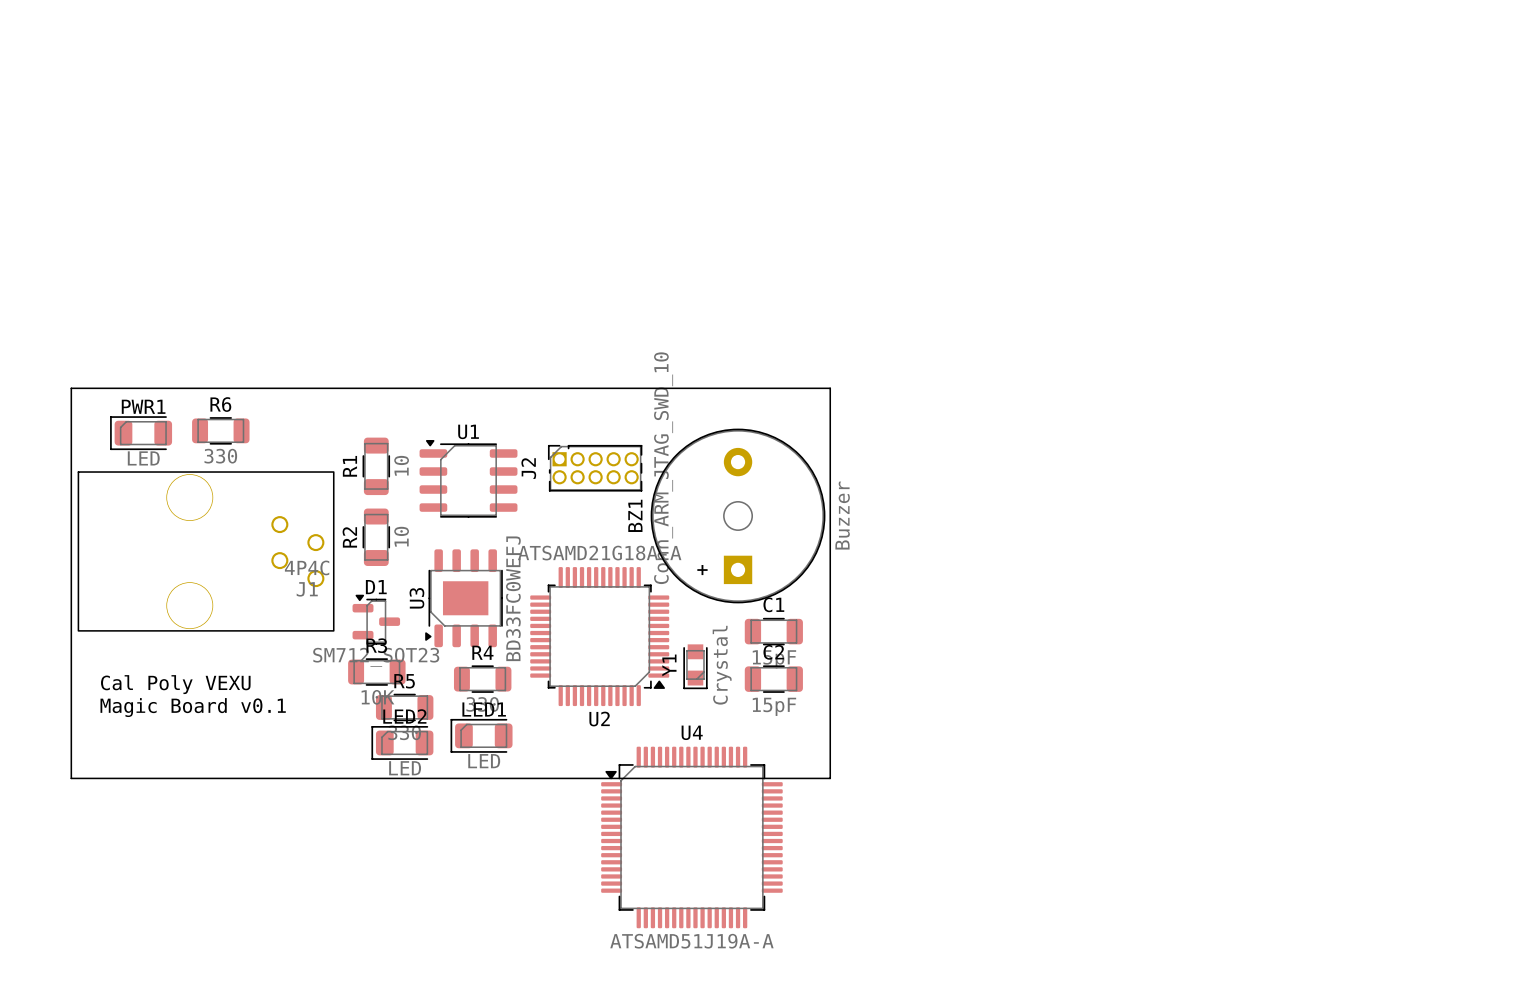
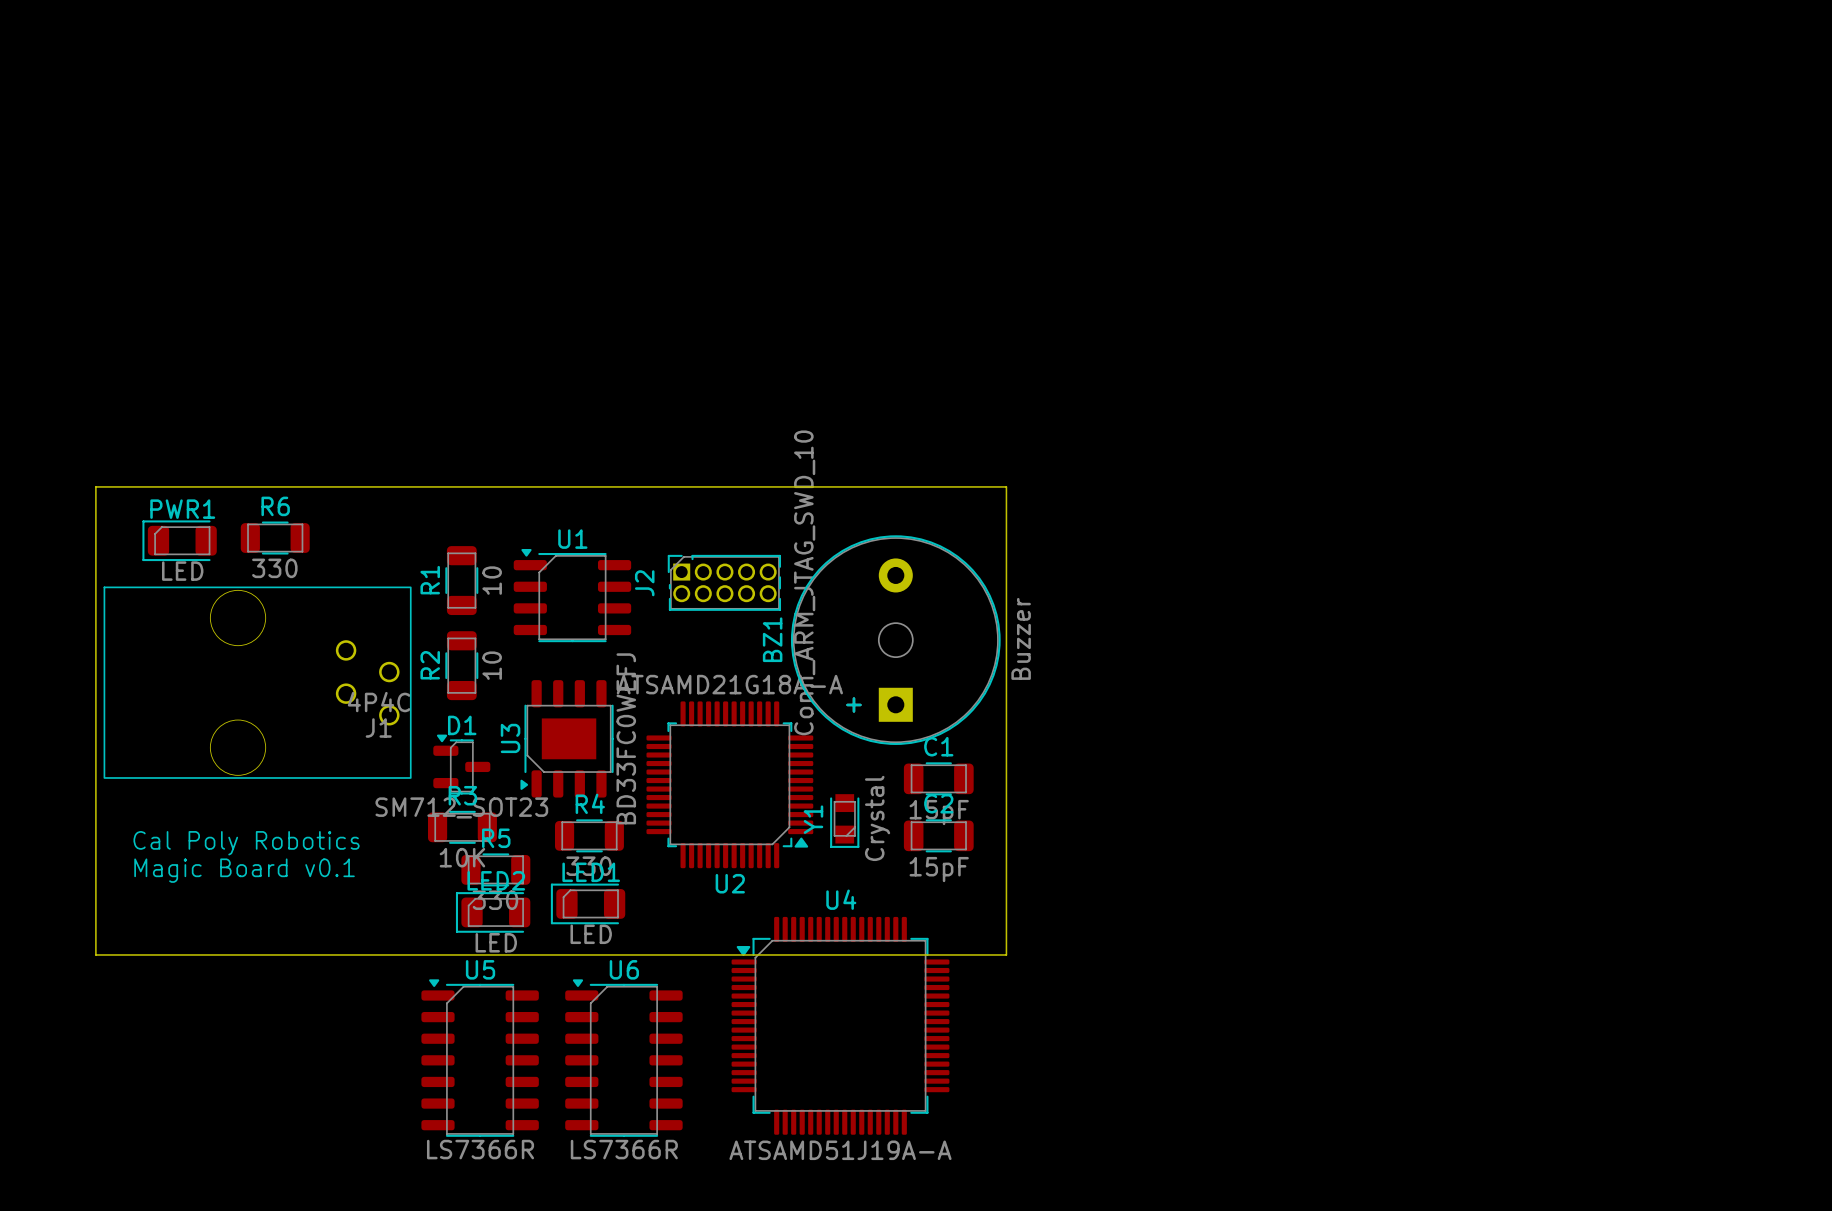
text: Cal Poly VEXU (175, 684) -> Cal Poly Robotics (246, 843)
U5: none -> LS7366R (480, 1058)
U6: none -> LS7366R (623, 1058)

